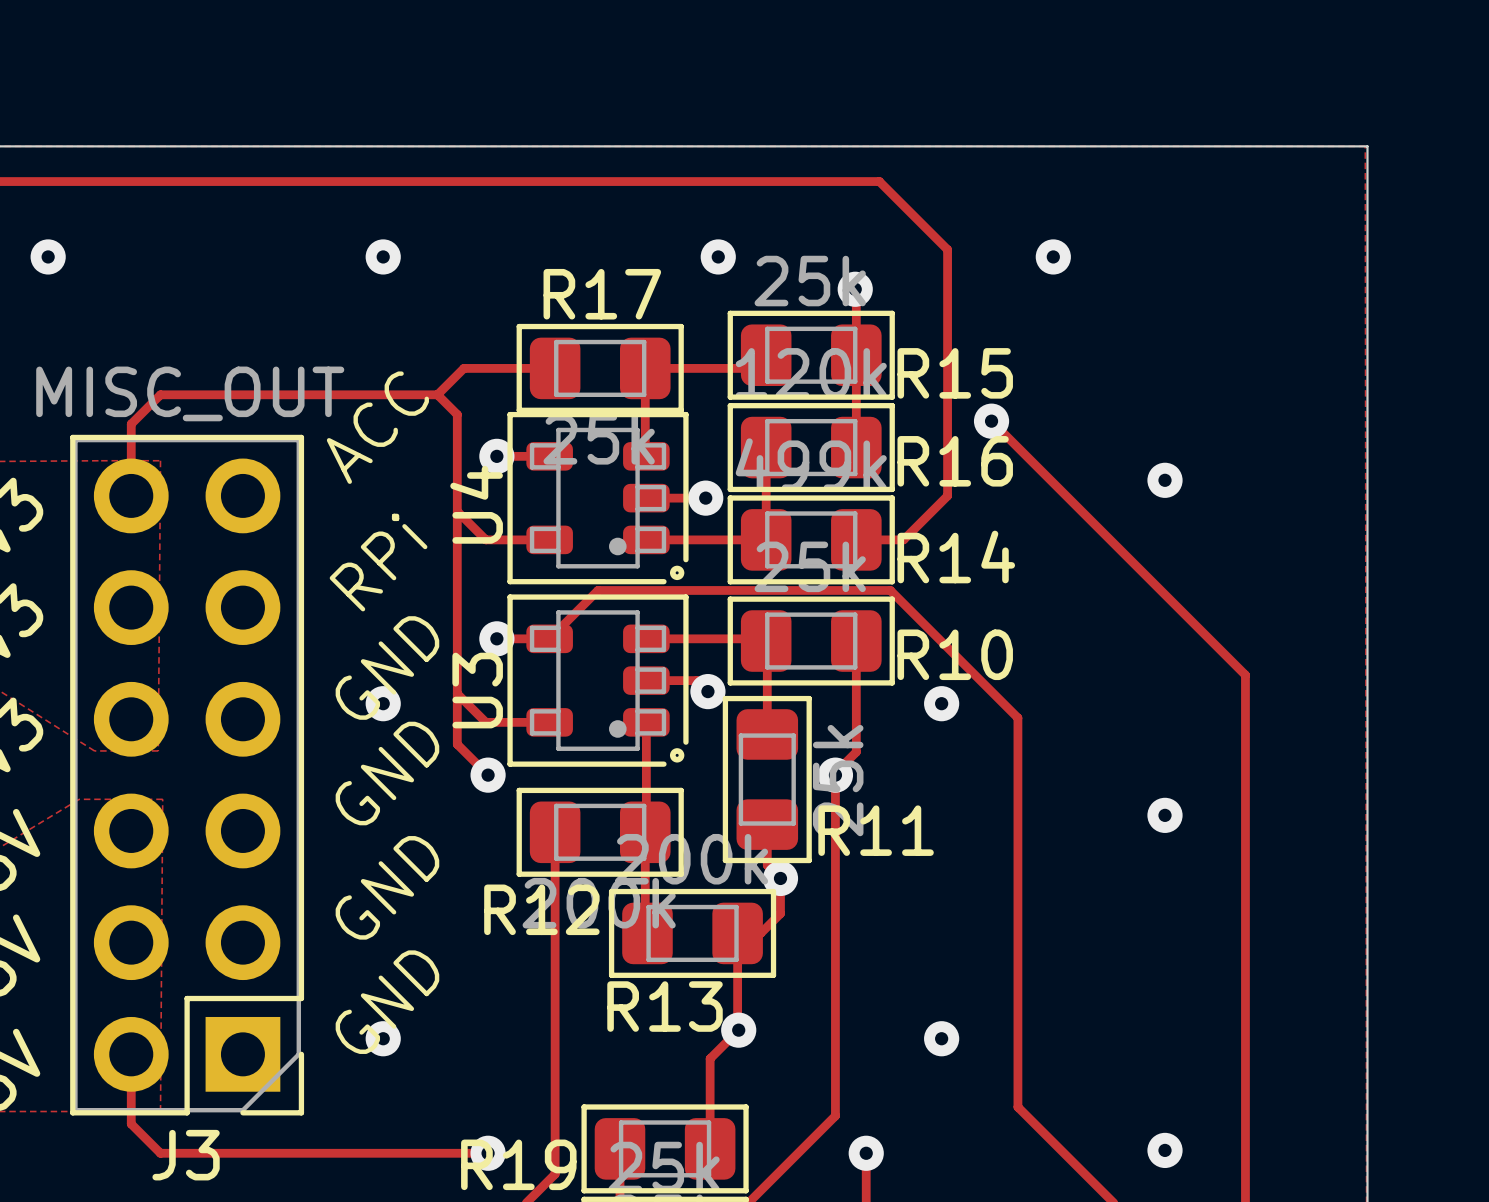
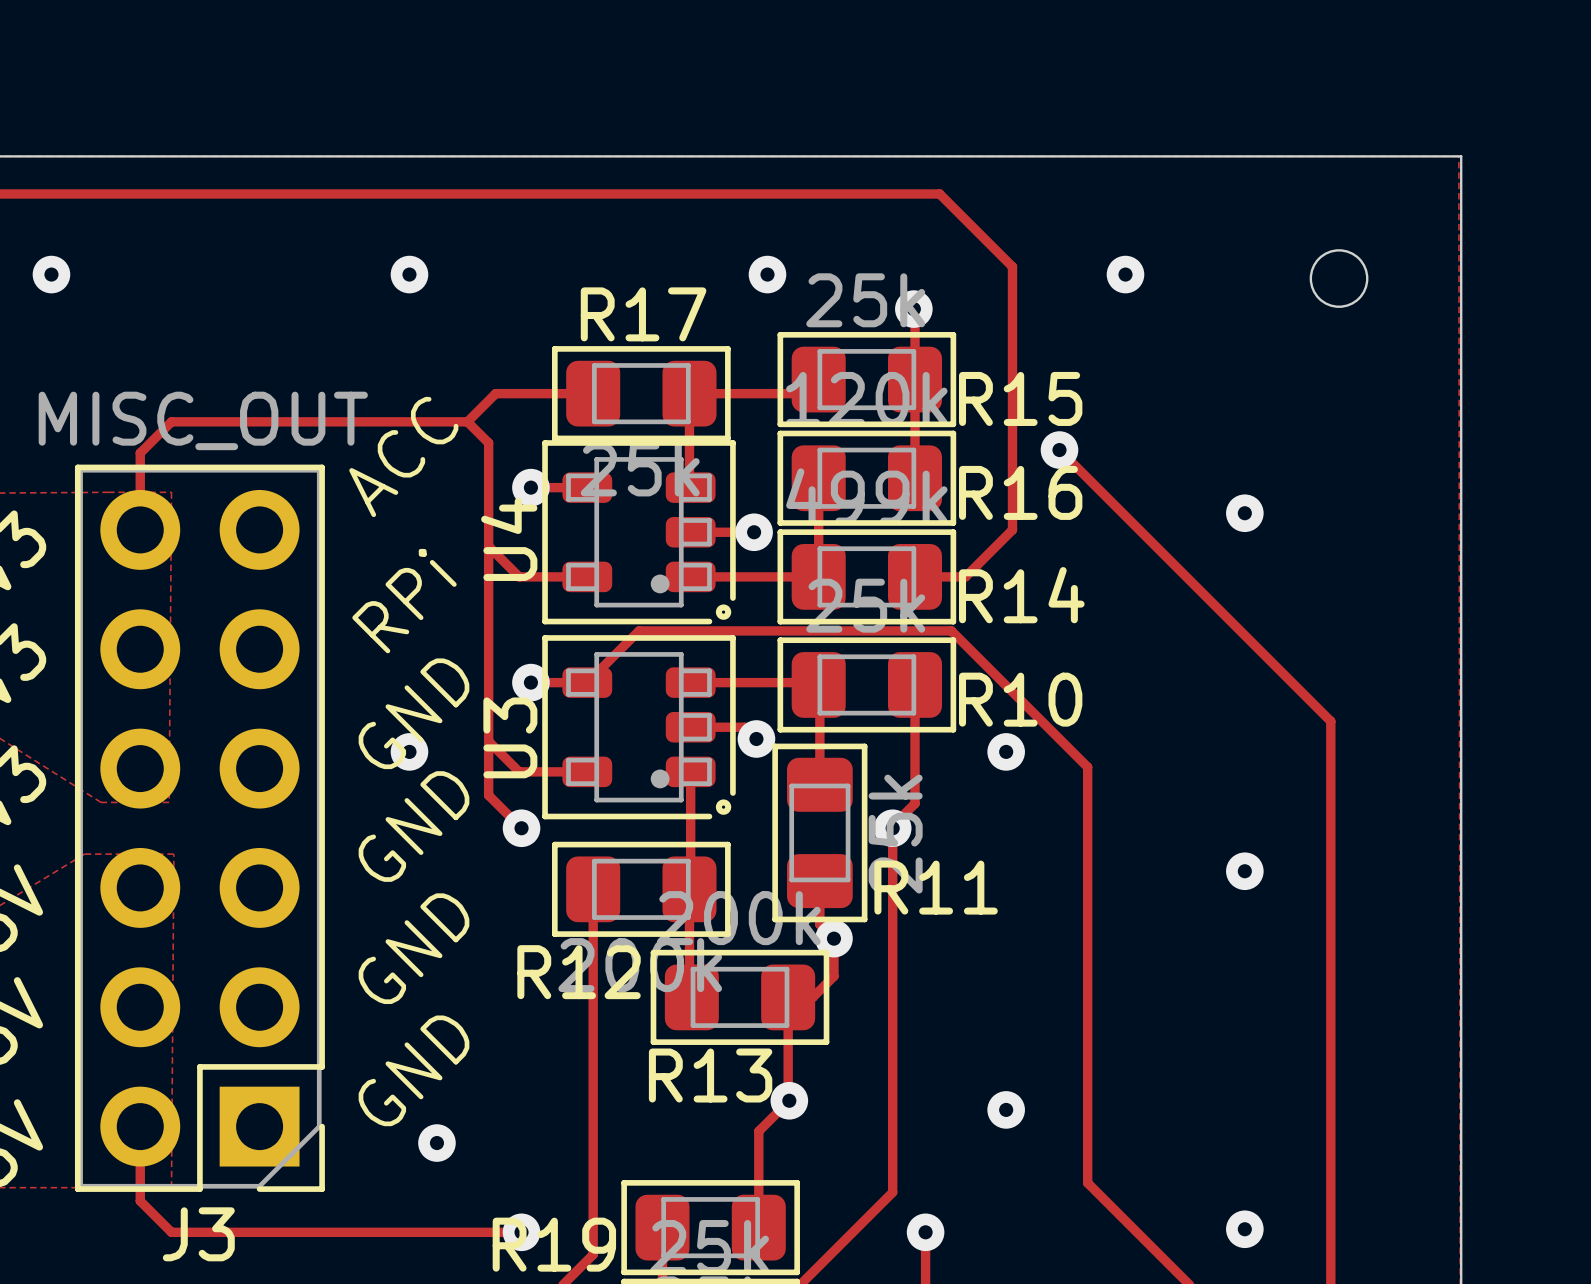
round board edge: none -> [1309, 249, 1369, 308]
via position: (383, 1038) -> (436, 1143)

